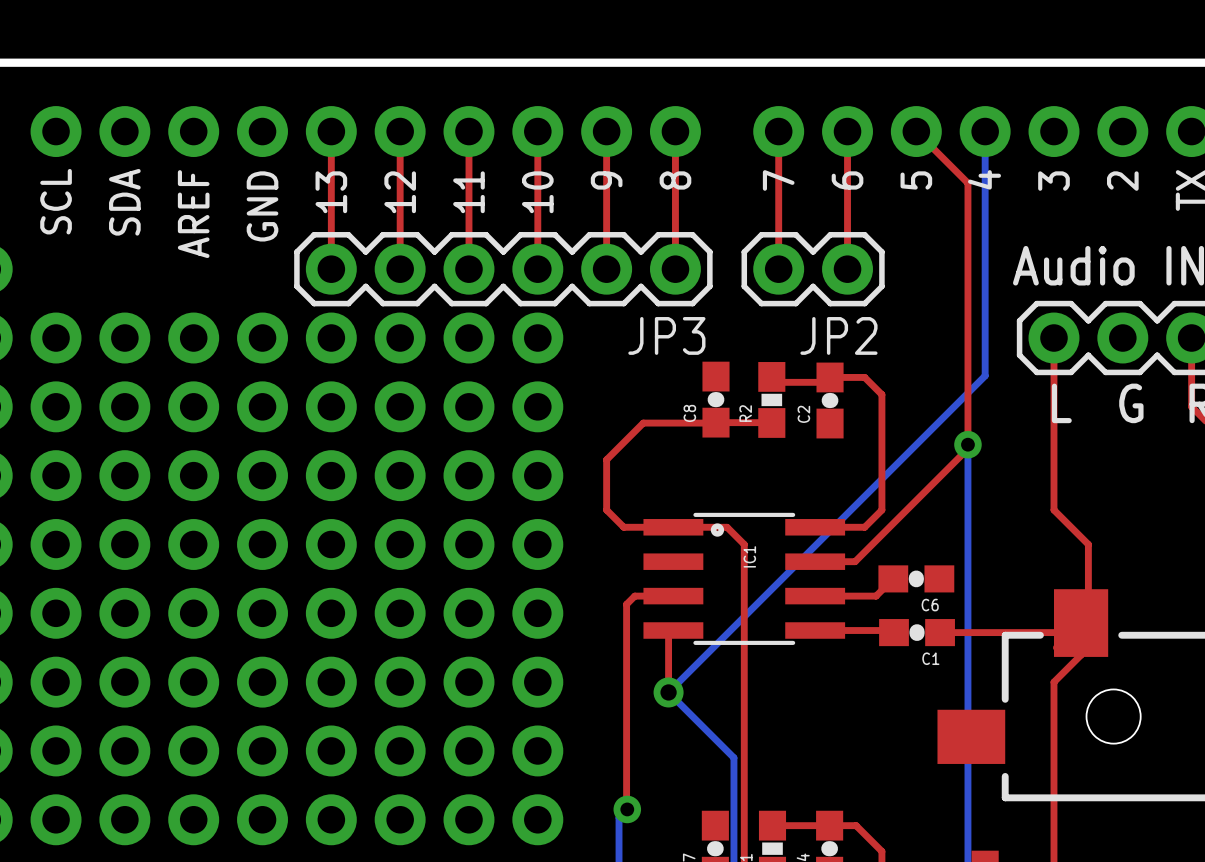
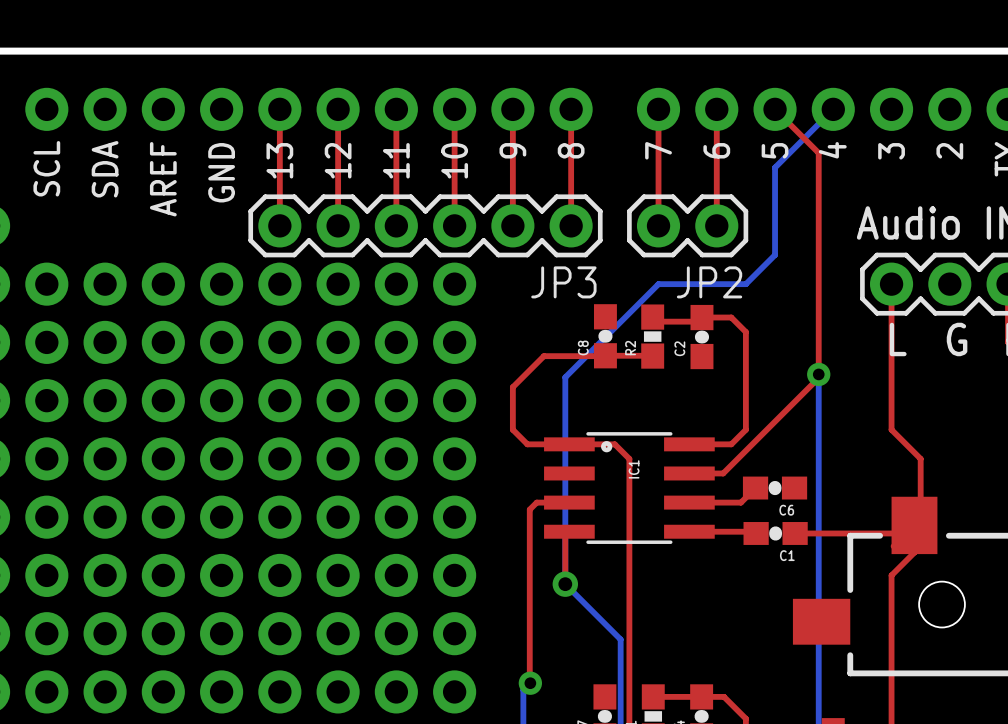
bottom track: (985, 131) (985, 375) (668, 692) -> (833, 109) (775, 167) (775, 255) (745, 284) (658, 284) (565, 377) (565, 584)

